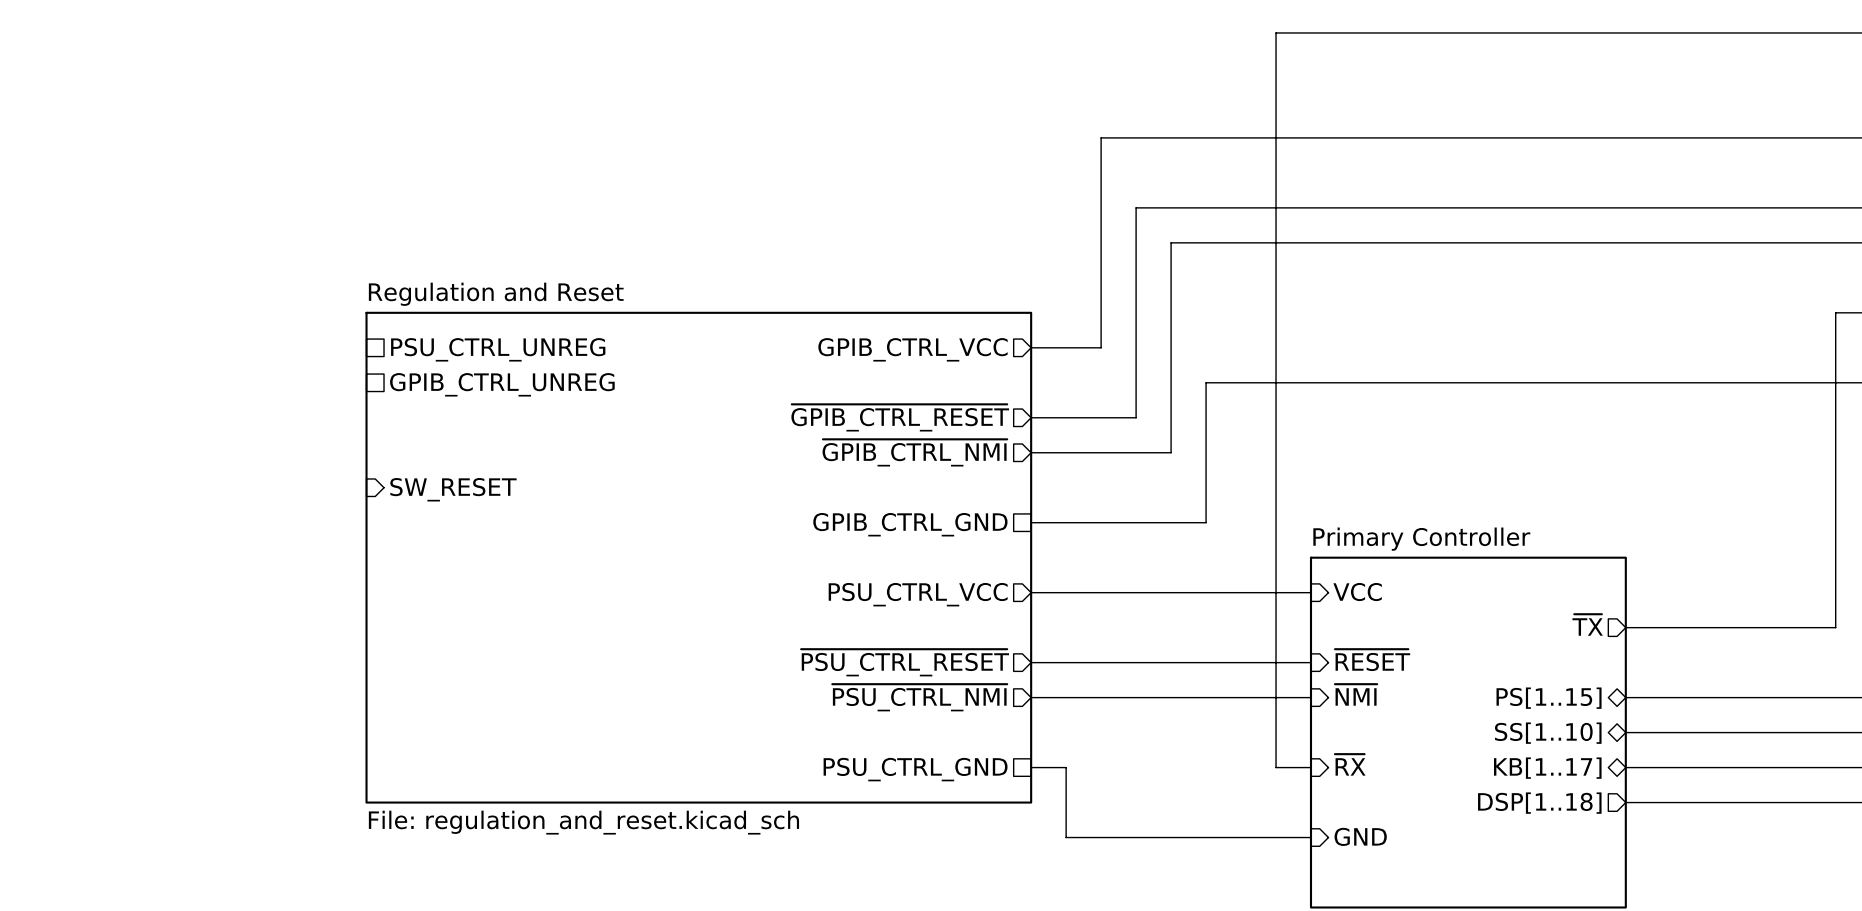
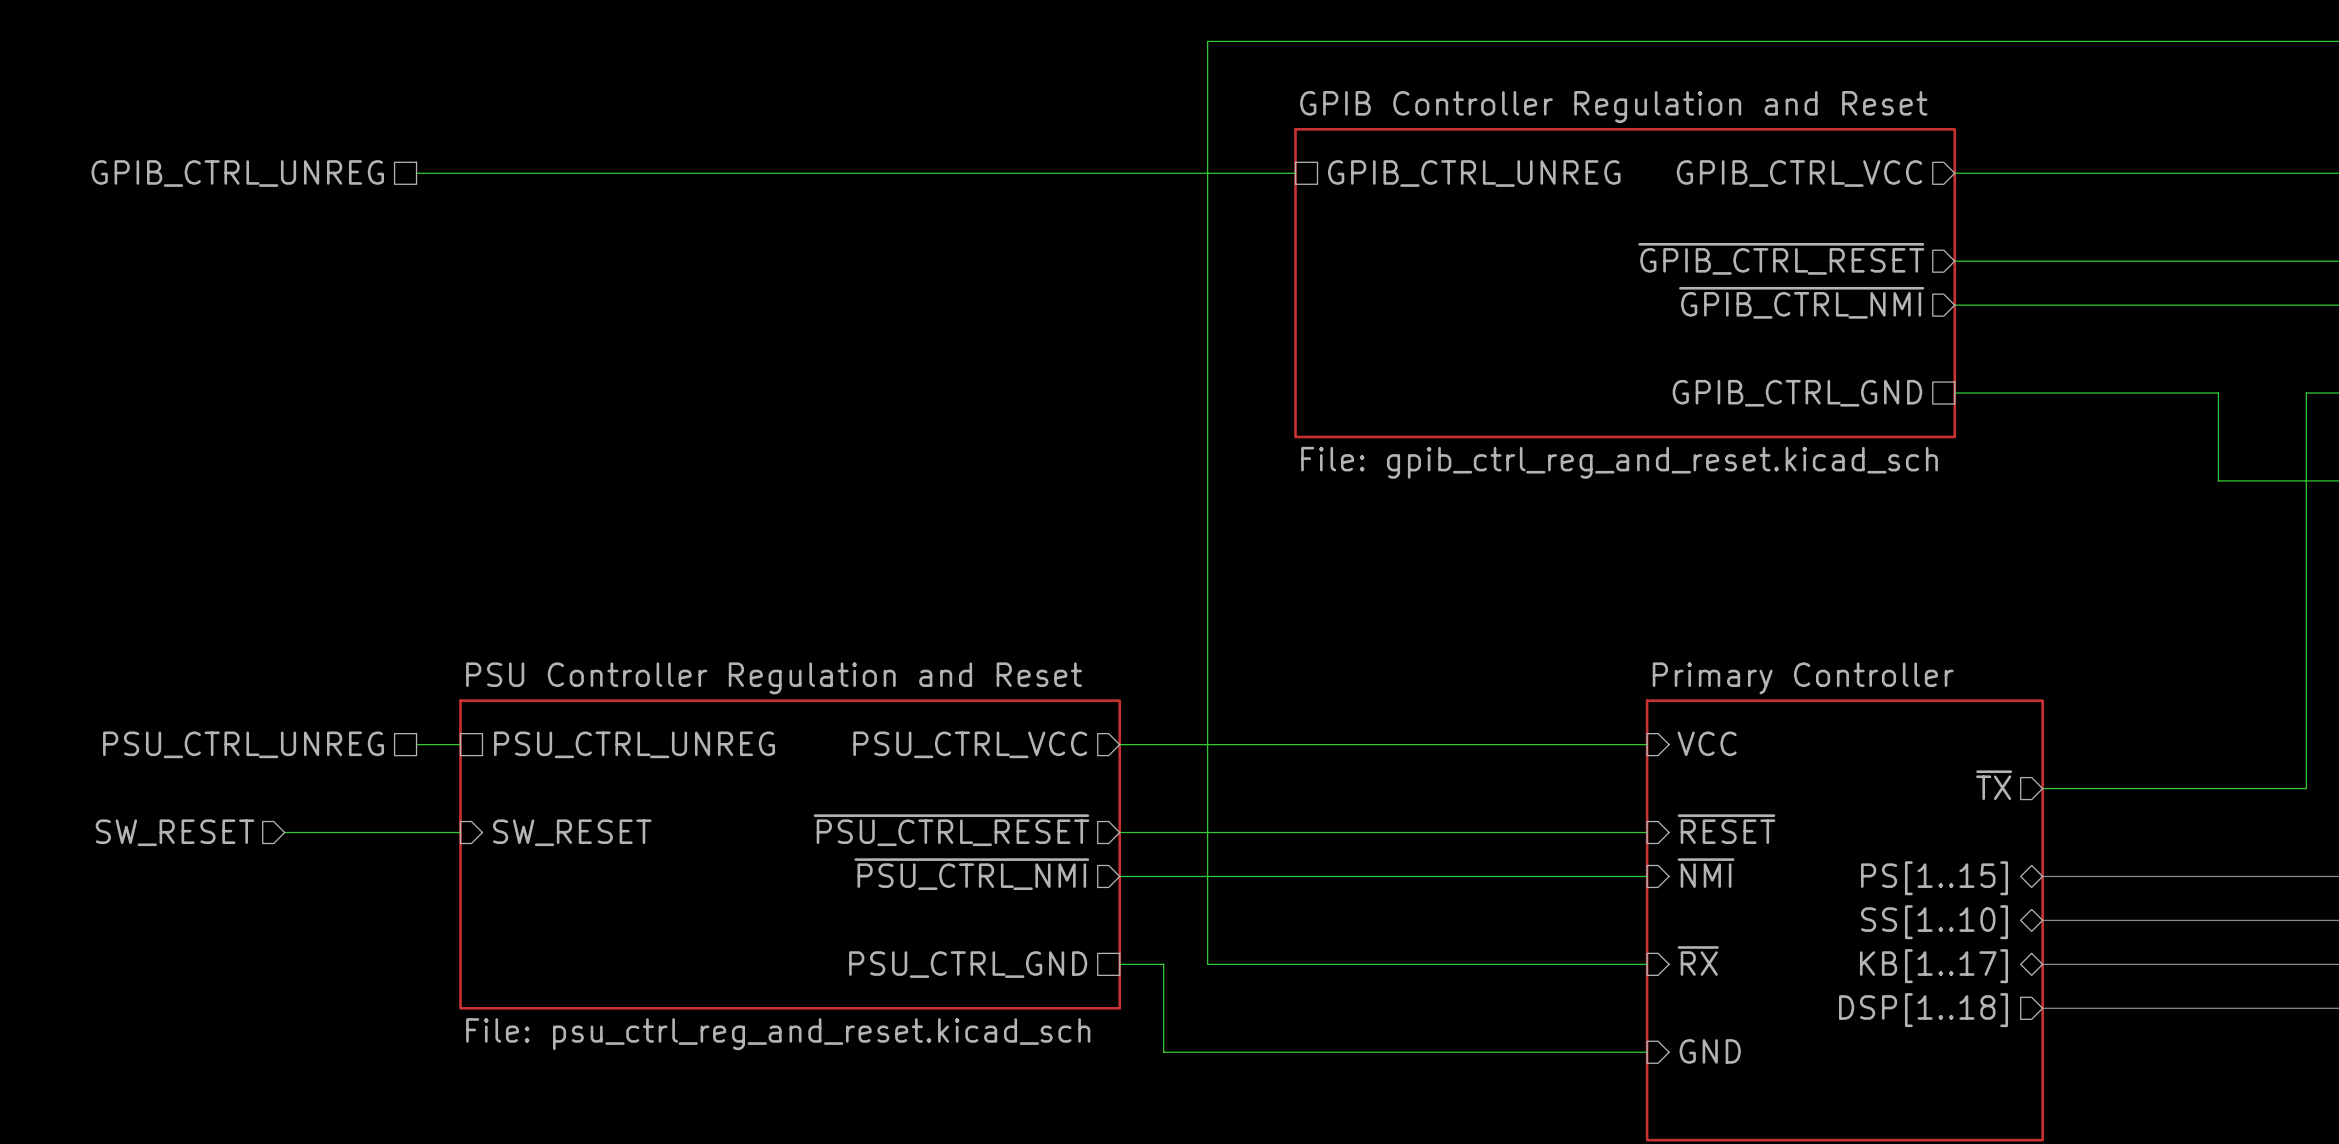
wire: (1276, 32) (1276, 767) -> (1603, 41) (1207, 41) (1207, 964) (1295, 964)
wire: none -> (416, 173) (1295, 173)
wire: (1555, 137) (1101, 137) (1101, 347) (1031, 347) -> none
hierarchical label: none -> GPIB_CTRL_UNREG (237, 173)
sheet pin: none -> GPIB_CTRL_UNREG (1474, 173)
sheet pin: none -> GPIB_CTRL_VCC (1799, 173)
wire: (1555, 207) (1136, 207) (1136, 417) (1031, 417) -> none
sheet pin: none -> ~{GPIB_CTRL_RESET} (1781, 258)
sheet GPIB Controller Regulation and Reset: none -> File: gpib_ctrl_reg_and_reset.kicad_sch (1625, 283)
wire: (1555, 242) (1171, 242) (1171, 452) (1031, 452) -> none
sheet pin: none -> ~{GPIB_CTRL_NMI} (1801, 302)
sheet pin: none -> GPIB_CTRL_GND (1797, 393)
sheet pin position: PSU_CTRL_UNREG (498, 349) -> PSU_CTRL_UNREG (634, 744)
sheet pin: GPIB_CTRL_VCC (912, 349) -> none
wire: (1765, 382) (1206, 382) (1206, 522) (1031, 522) -> (2218, 480) (2218, 393) (1954, 393)
sheet pin: GPIB_CTRL_UNREG (502, 384) -> none
sheet pin: ~{GPIB_CTRL_RESET} (900, 417) -> none
sheet pin: ~{GPIB_CTRL_NMI} (914, 452) -> none
sheet pin position: SW_RESET (453, 489) -> SW_RESET (572, 832)
sheet pin: GPIB_CTRL_GND (910, 524) -> none
sheet Regulation and Reset: File: regulation_and_reset.kicad_sch (698, 557) -> none
wire: none -> (416, 744) (460, 744)
wire: none -> (1119, 744) (1295, 744)
hierarchical label: none -> PSU_CTRL_UNREG (243, 744)
sheet pin position: PSU_CTRL_VCC (918, 594) -> PSU_CTRL_VCC (970, 744)
wire: none -> (284, 832) (460, 832)
wire: none -> (1119, 832) (1295, 832)
sheet pin position: ~{PSU_CTRL_RESET} (905, 662) -> ~{PSU_CTRL_RESET} (951, 830)
hierarchical label: none -> SW_RESET (175, 832)
sheet PSU Controller Regulation and Reset: none -> File: psu_ctrl_reg_and_reset.kicad_sch (790, 854)
wire: none -> (1119, 876) (1295, 876)
sheet pin position: ~{PSU_CTRL_NMI} (919, 697) -> ~{PSU_CTRL_NMI} (971, 874)
wire: (1066, 767) (1066, 837) -> (1119, 964) (1163, 964) (1163, 1052) (1339, 1052)
wire: none -> (1339, 964) (1603, 964)
sheet pin position: PSU_CTRL_GND (915, 769) -> PSU_CTRL_GND (968, 964)

